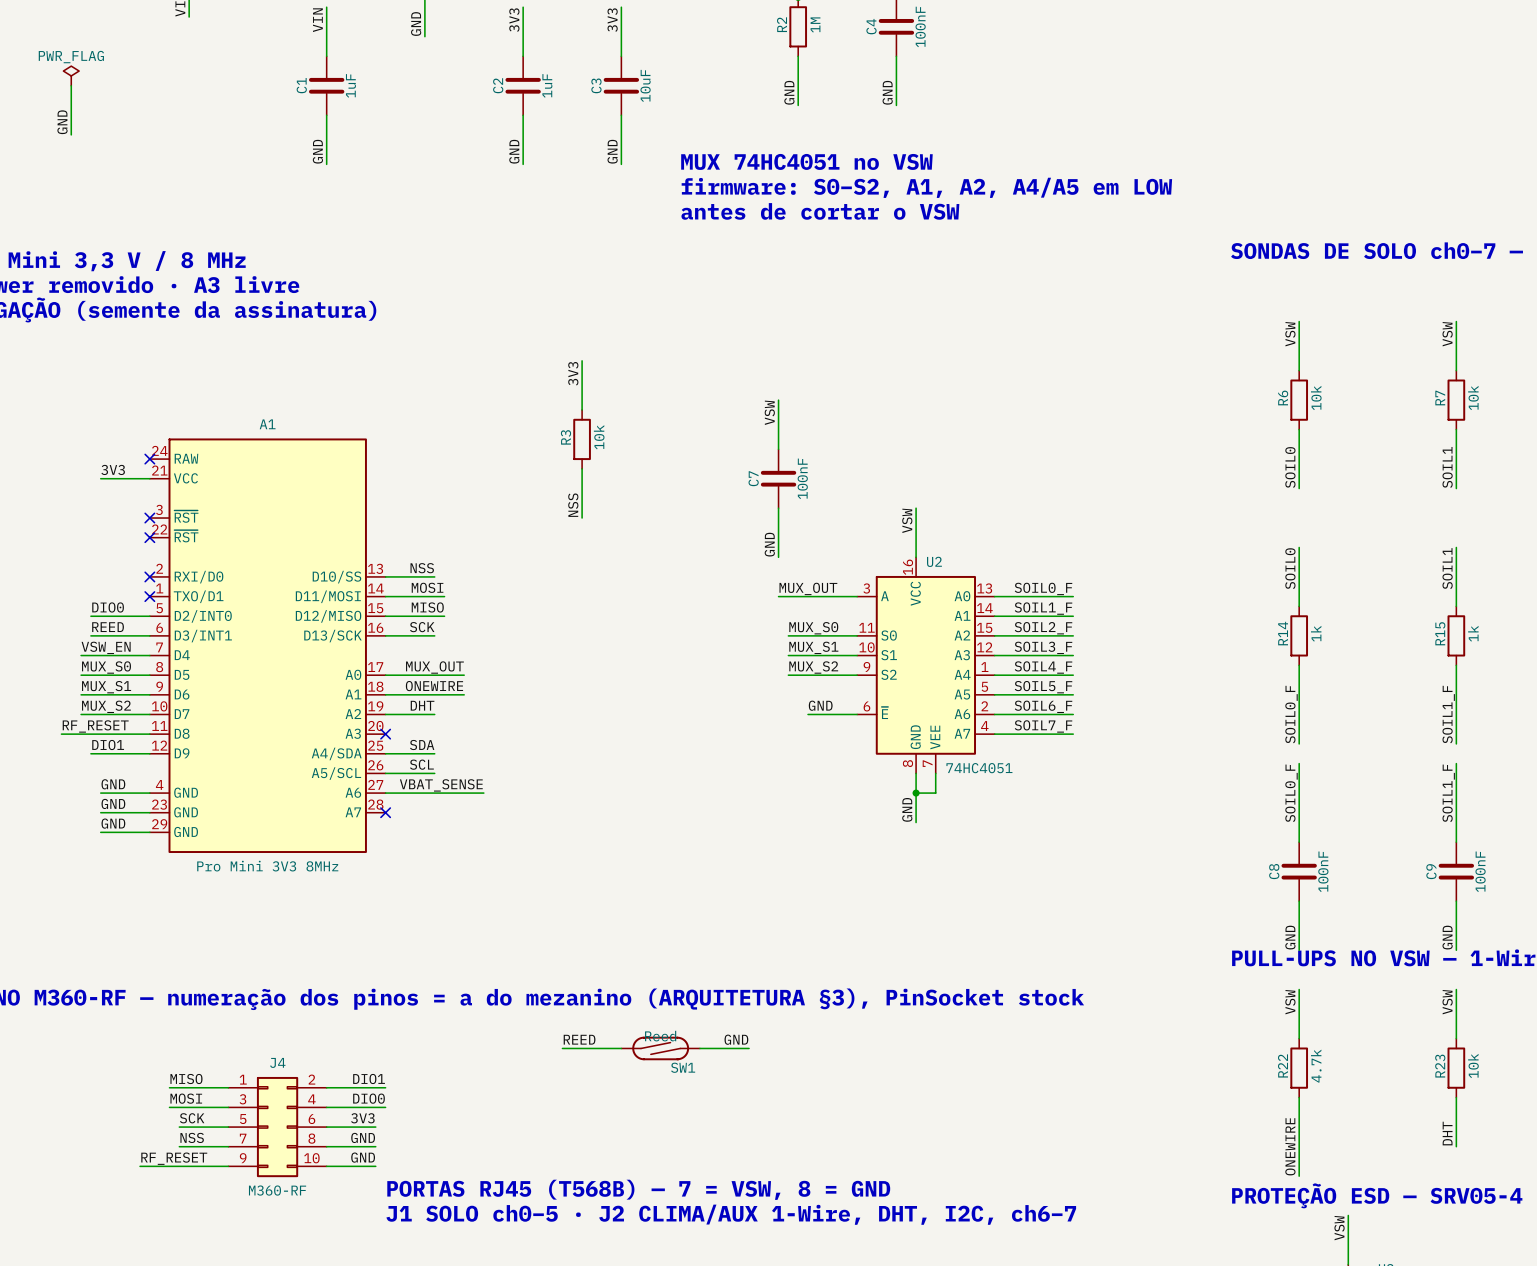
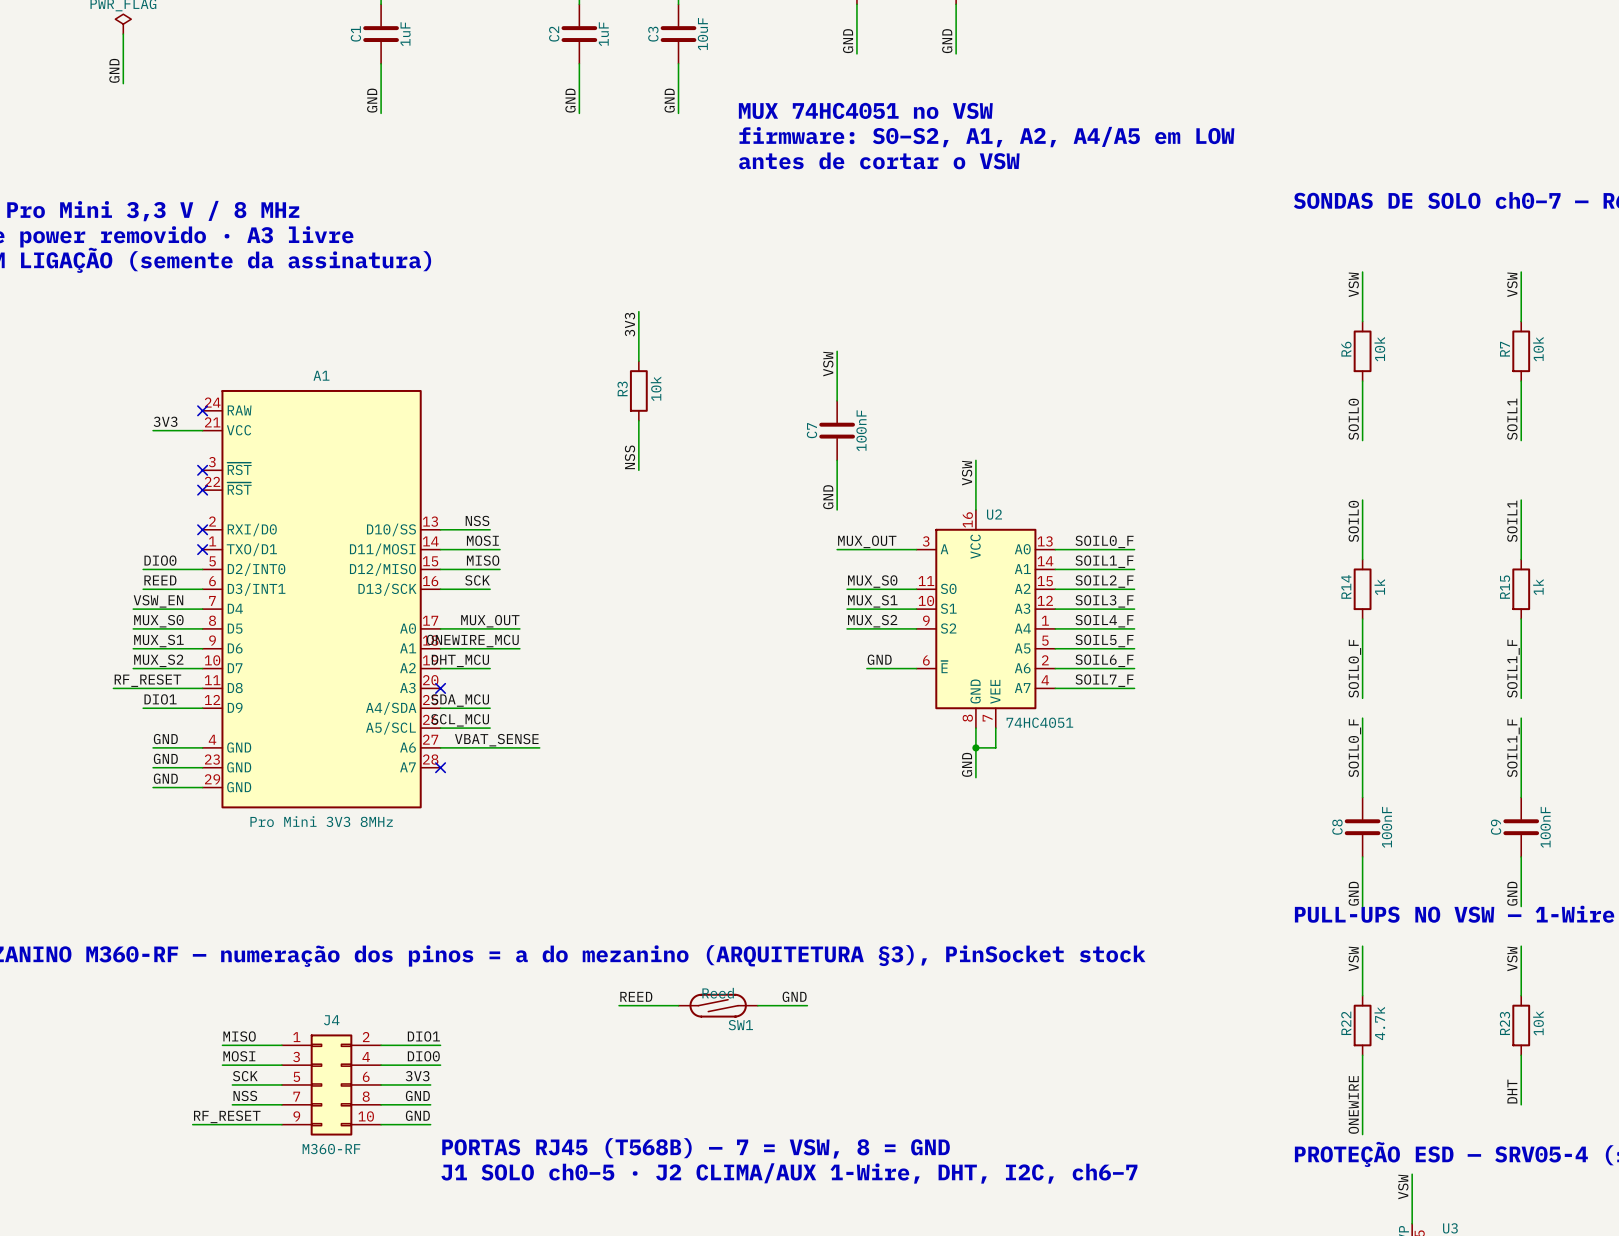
label: ONEWIRE (434, 686) -> ONEWIRE_MCU (472, 641)
label: DHT (422, 705) -> DHT_MCU (460, 660)
label: SDA (422, 745) -> SDA_MCU (460, 700)
label: SCL (421, 764) -> SCL_MCU (460, 720)

